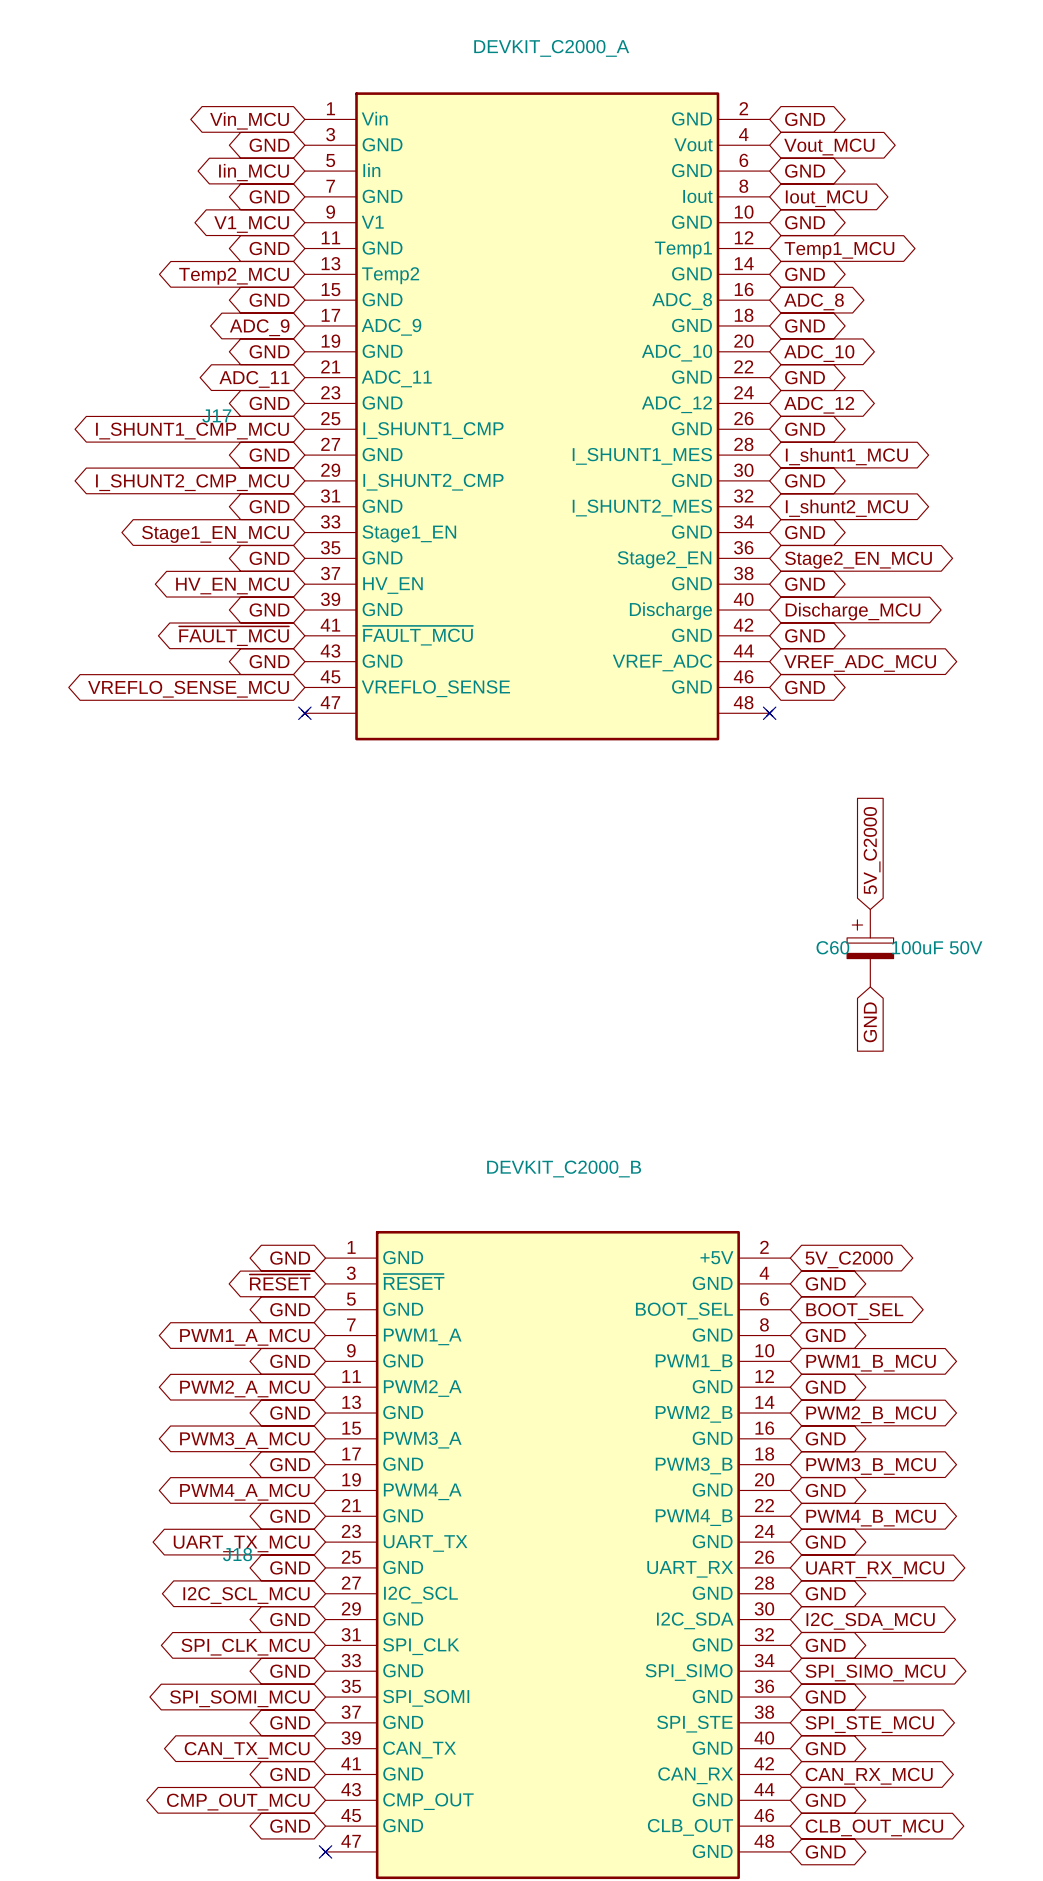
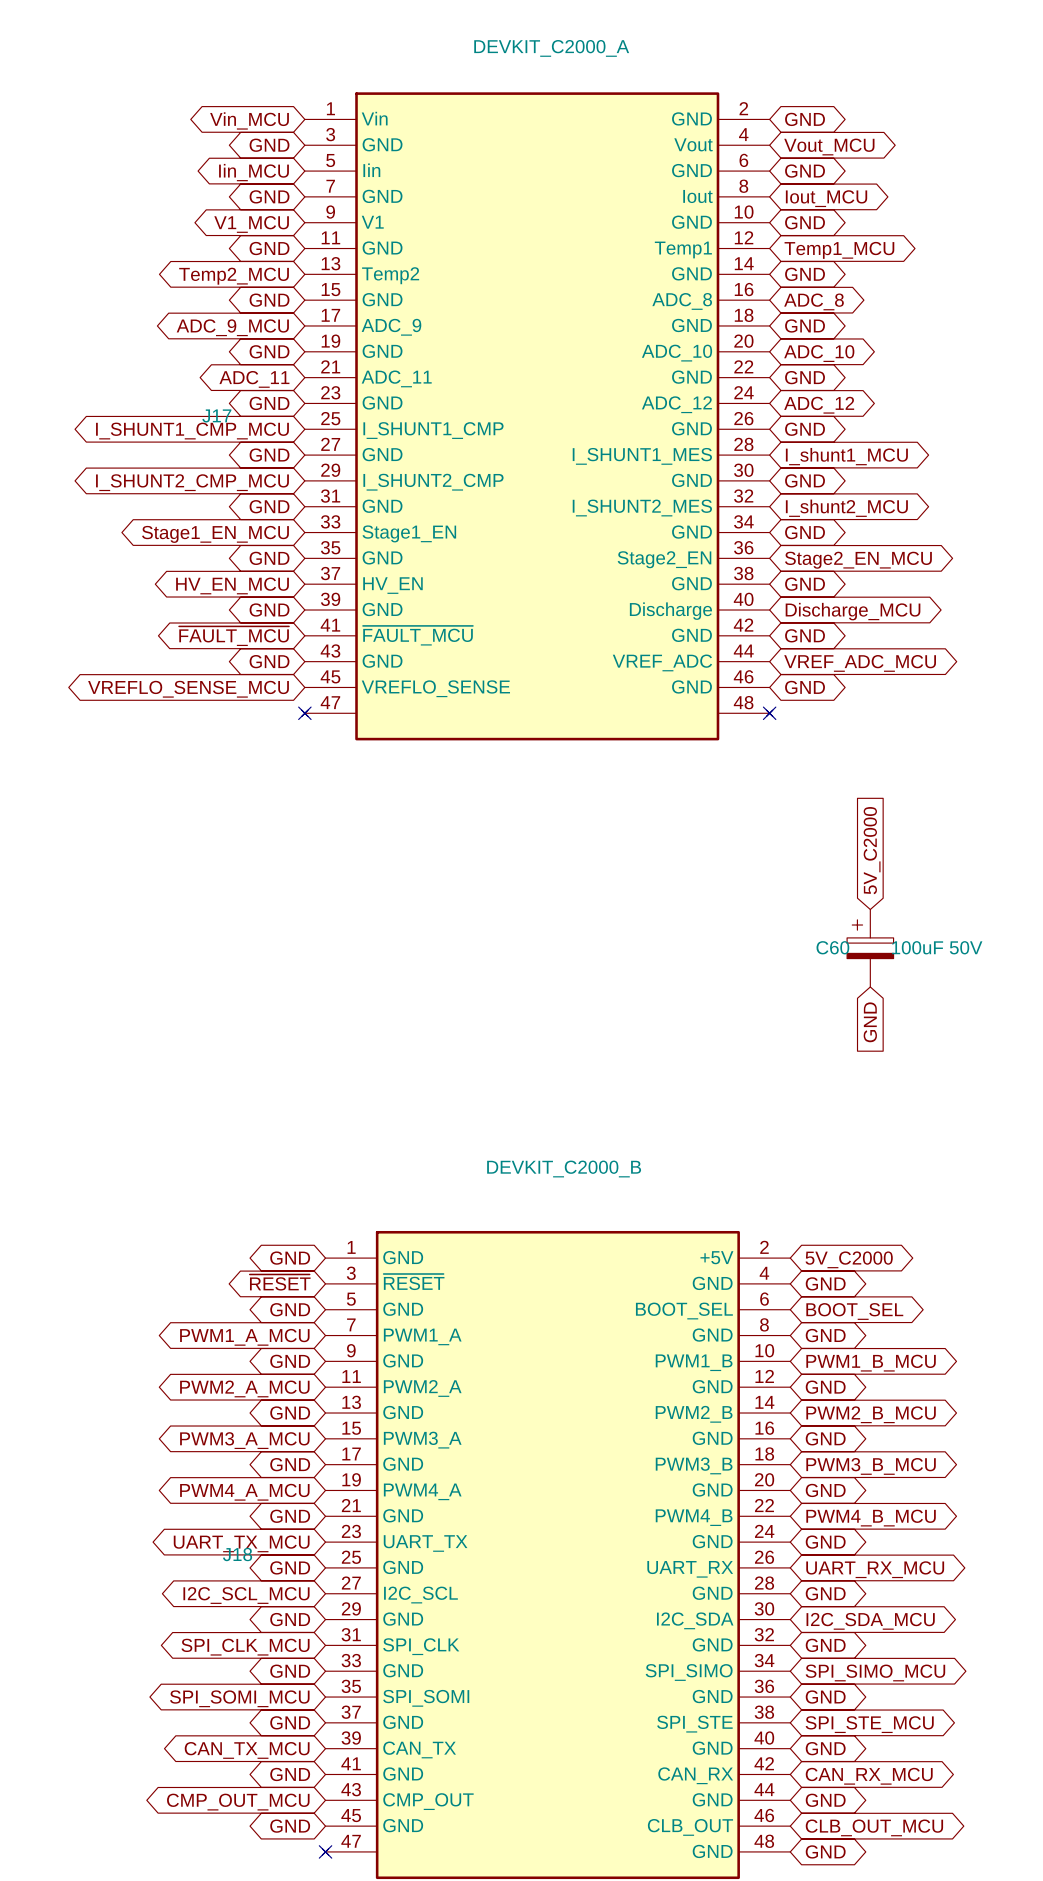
global label: ADC_9 (259, 327) -> ADC_9_MCU (232, 327)

